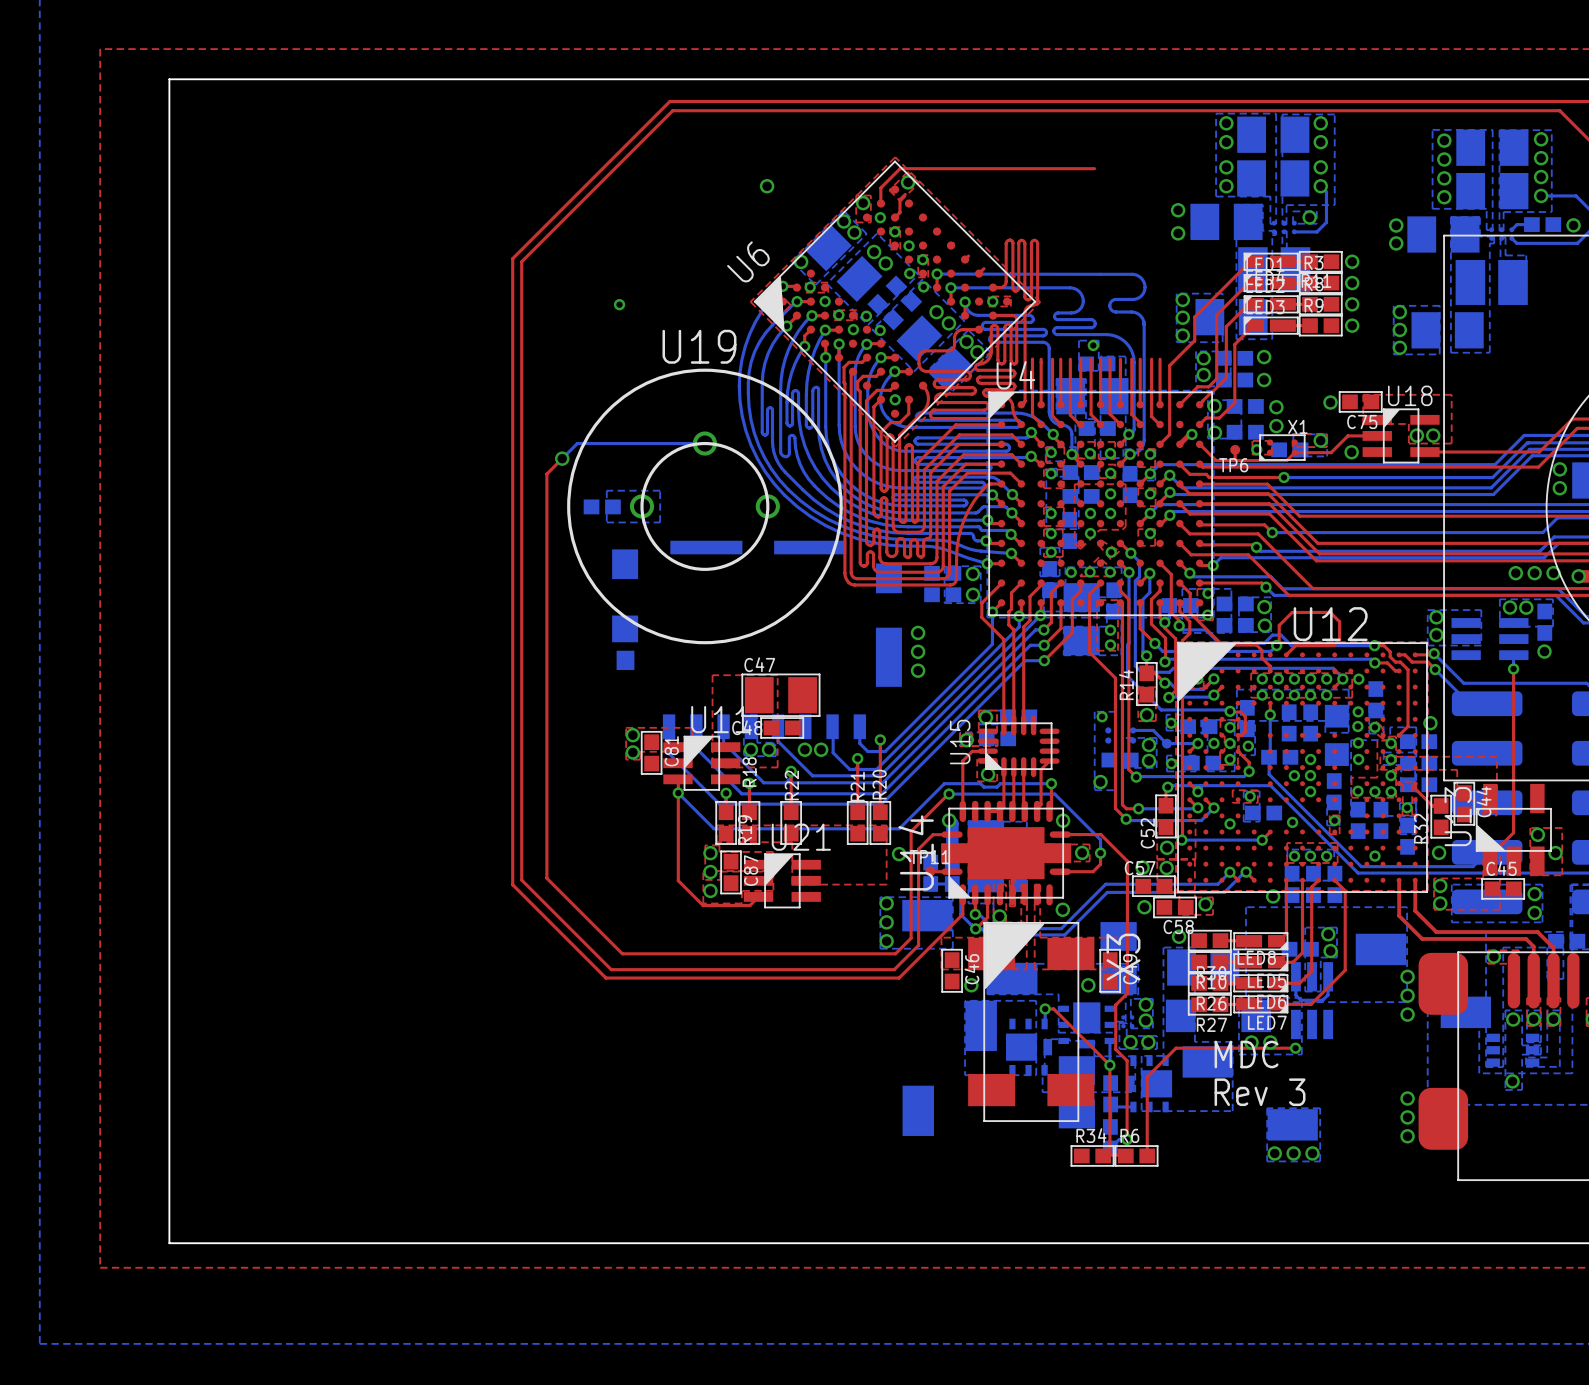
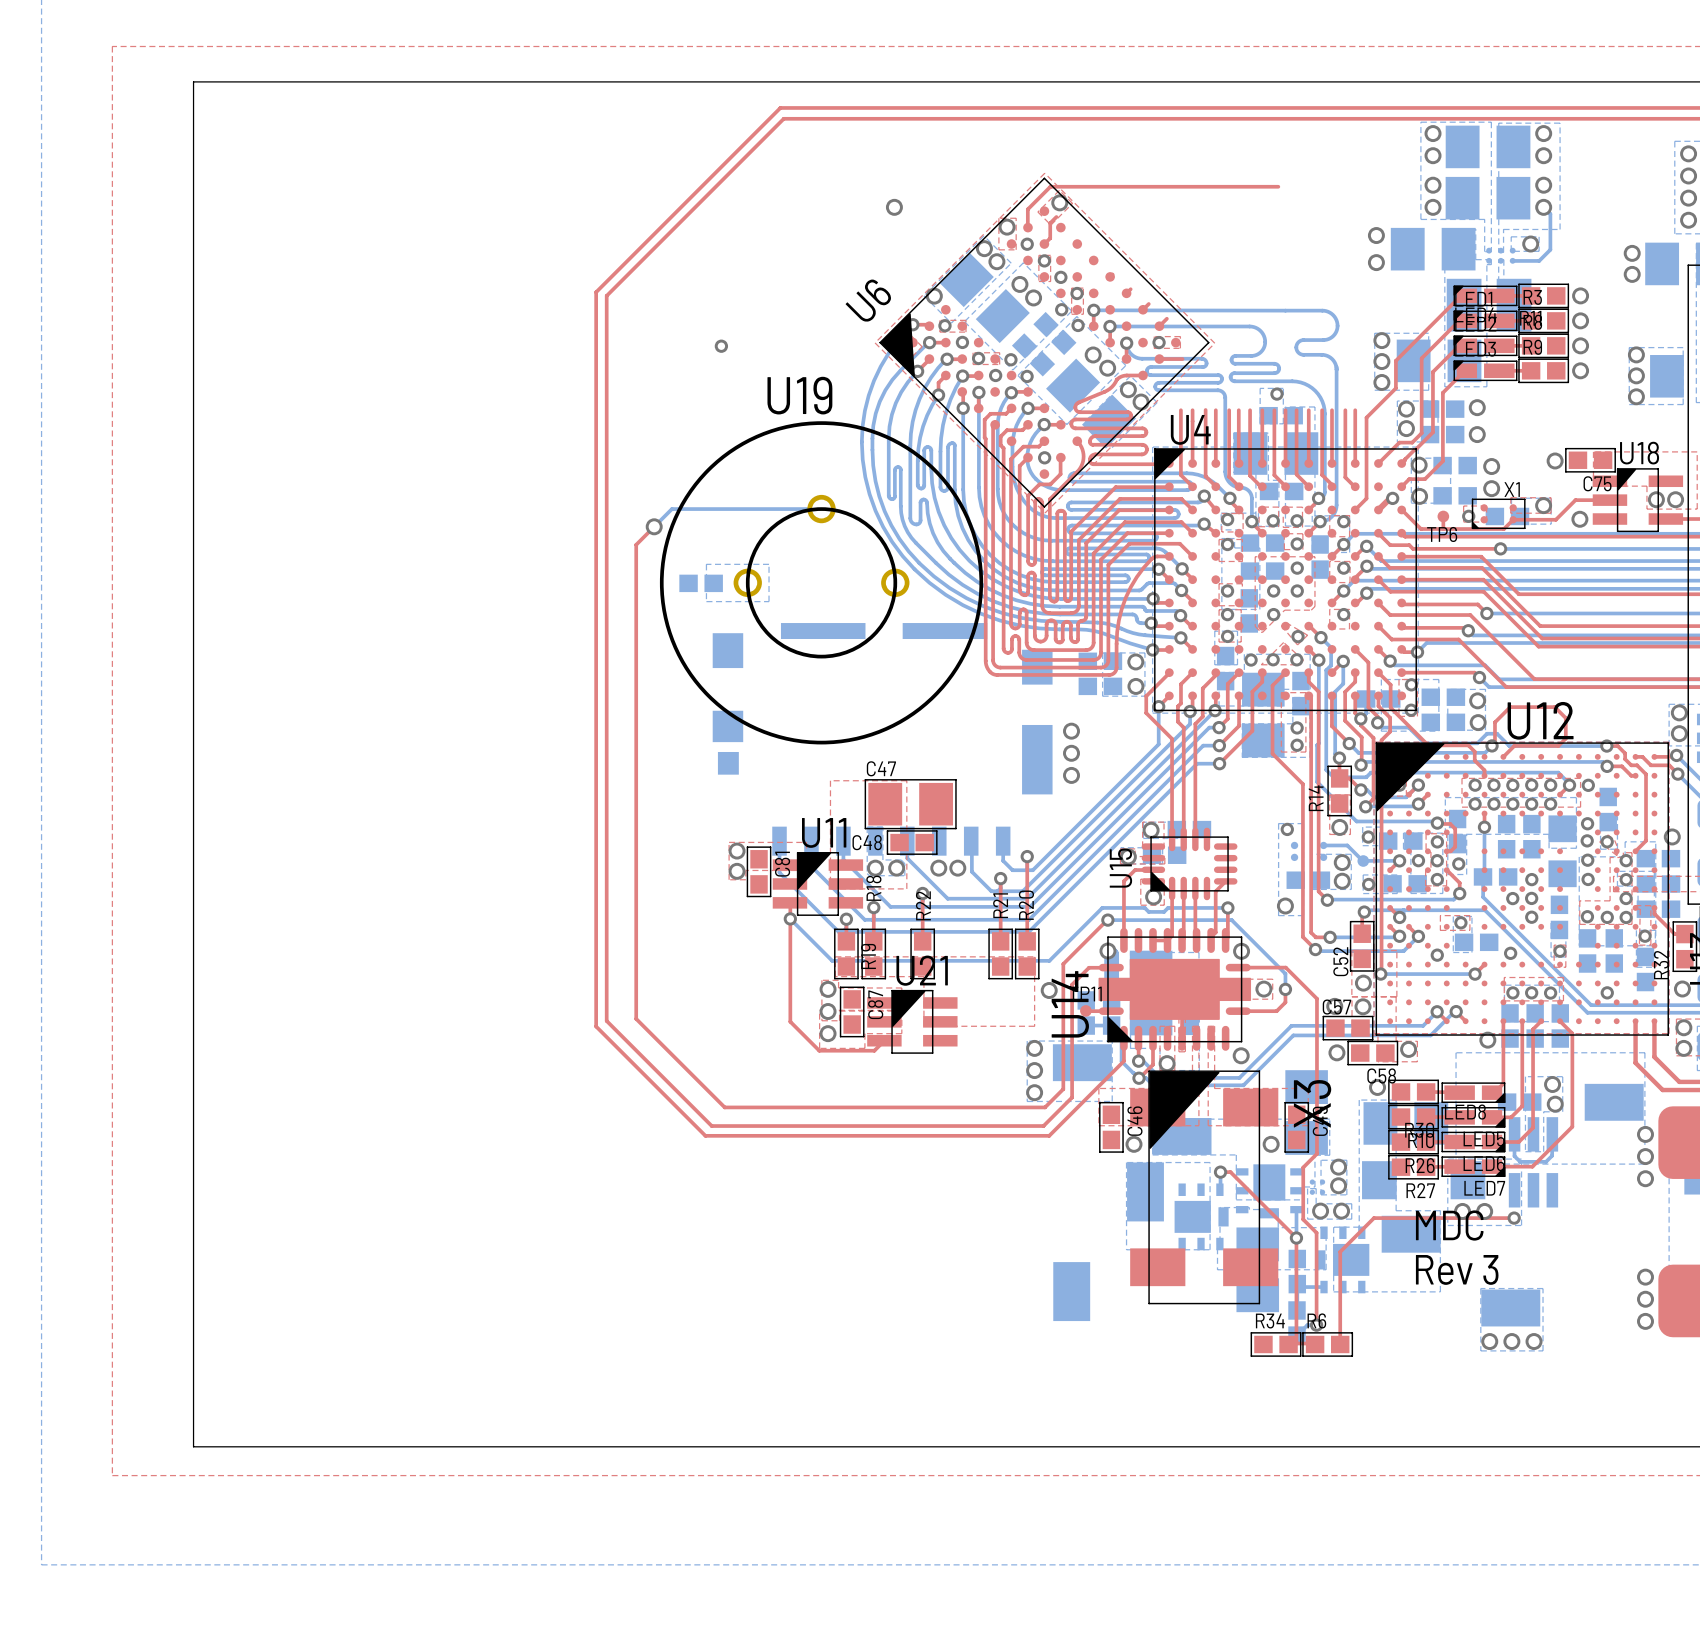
top track: none -> (1166, 318) (1159, 326)
top track: (993, 287) (1001, 287) (1005, 283) (1006, 243) (1010, 240) (1012, 242) (1012, 288) (1015, 291) (1018, 289) (1018, 242) (1022, 240) (1024, 243) (1024, 297) (1027, 299) (1030, 298) (1031, 242) (1033, 240) (1036, 241) (1037, 300) (1035, 304) (1027, 307) (1025, 311) (1025, 400) (1021, 404) -> (1192, 410) (1192, 463)
top track: (1012, 315) (1016, 319) (1016, 363) (1013, 363) (1011, 361) (1011, 326) (1008, 324) (1004, 327) (1004, 361) (1001, 363) (998, 361) (997, 328) (993, 325) (991, 327) (990, 356) (986, 361) (977, 364) (975, 367) (977, 370) (1014, 371) (1014, 374) (1012, 376) (979, 377) (977, 380) (980, 383) (1014, 384) (1014, 387) (1012, 389) (986, 389) (983, 393) (986, 396) (1003, 396) (1008, 398) (1018, 422) -> (1180, 410) (1180, 475) (1189, 483)
top track: (965, 329) (956, 333) (954, 346) (951, 350) (921, 352) (919, 356) (919, 365) (925, 371) (966, 371) (969, 373) (970, 377) (967, 379) (937, 379) (934, 384) (937, 387) (972, 387) (975, 390) (974, 393) (939, 394) (935, 397) (937, 402) (985, 402) (988, 407) (984, 410) (934, 410) (931, 412) (930, 416) (933, 418) (987, 418) (1000, 405) -> (1126, 375) (1118, 378) (1107, 390) (1077, 403) (1075, 408) (1079, 412) (1128, 412) (1130, 414) (1129, 418) (1075, 419) (1071, 421) (1071, 425) (1075, 428) (1142, 428) (1145, 430) (1146, 433) (1143, 436) (1092, 436) (1089, 441) (1092, 444) (1142, 444) (1146, 449) (1142, 454) (1093, 454) (1089, 459) (1092, 463) (1168, 464)

